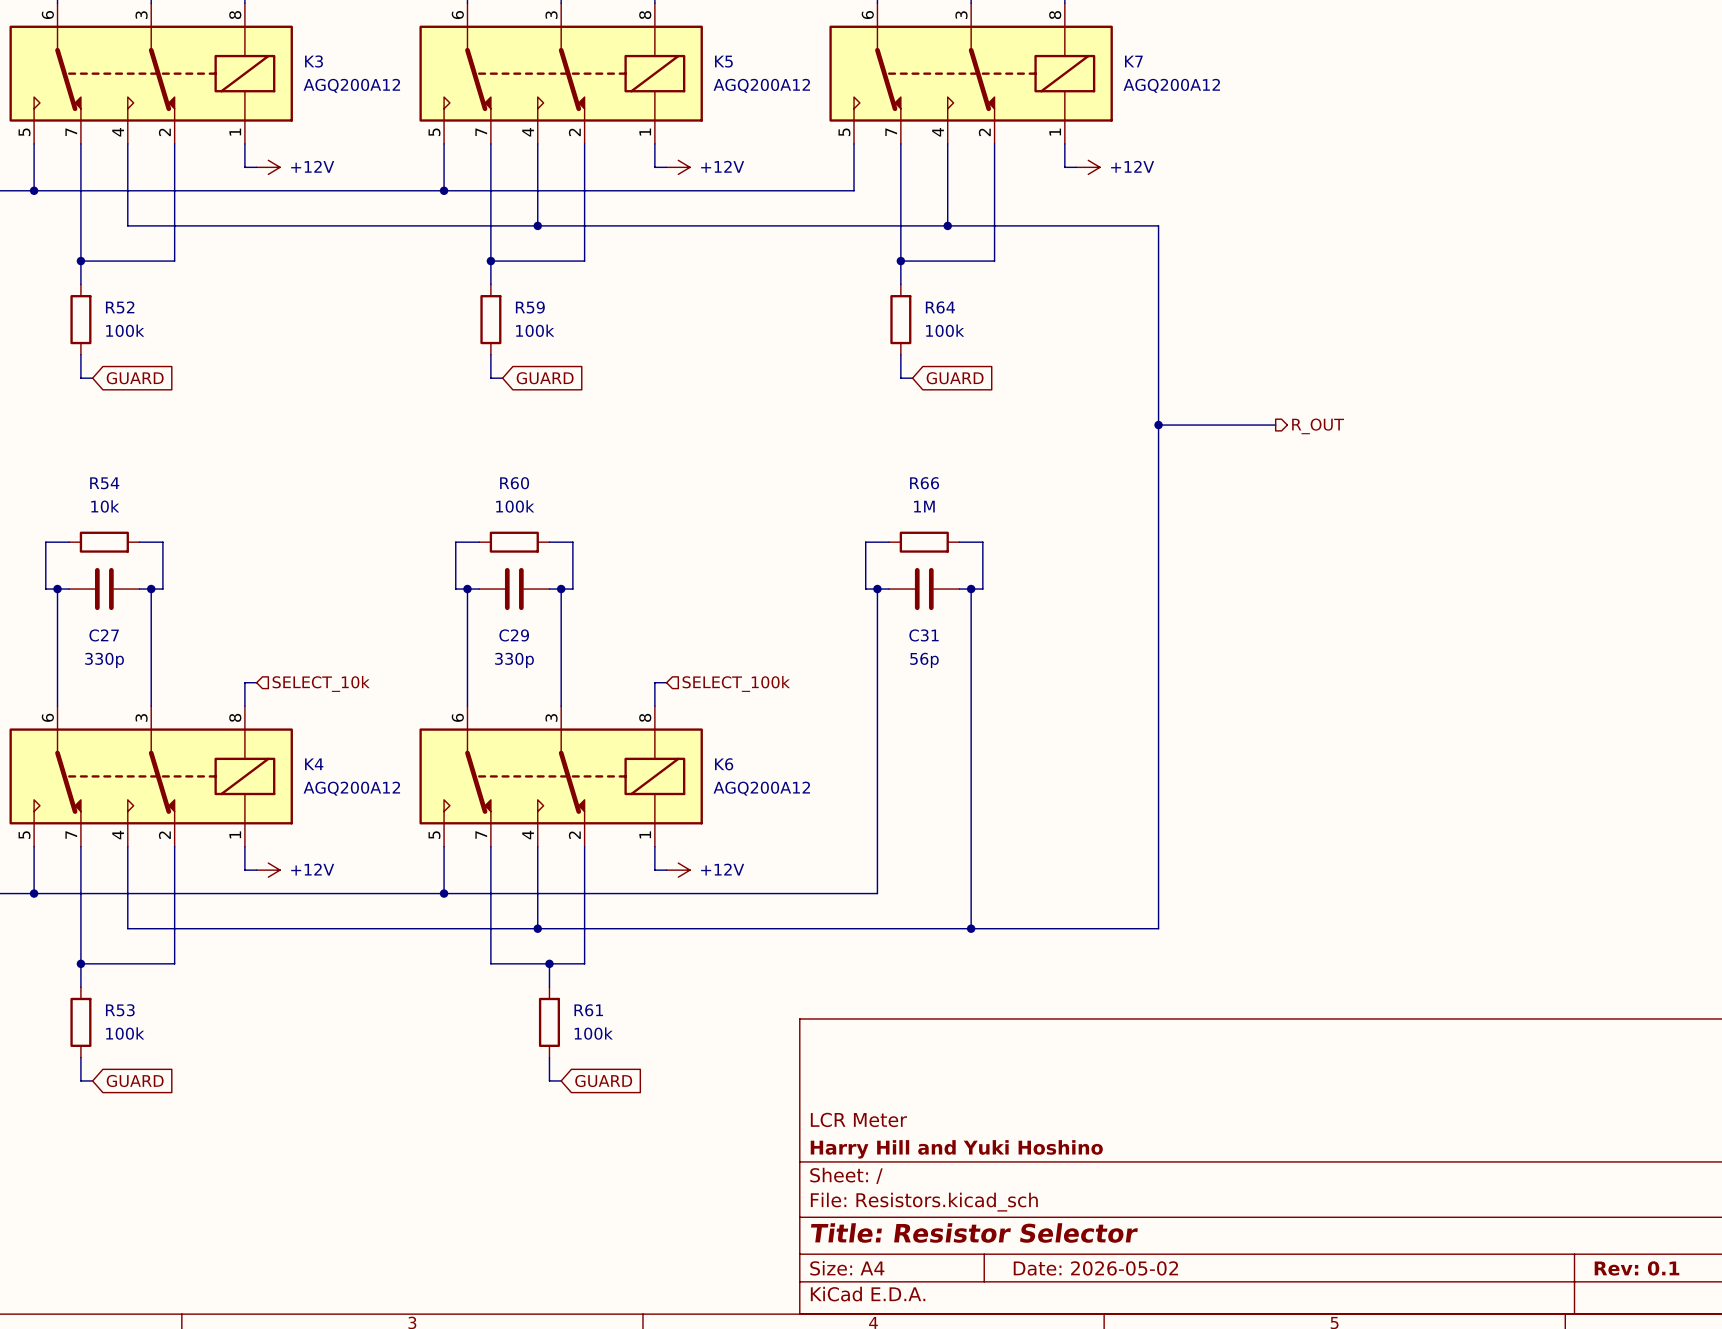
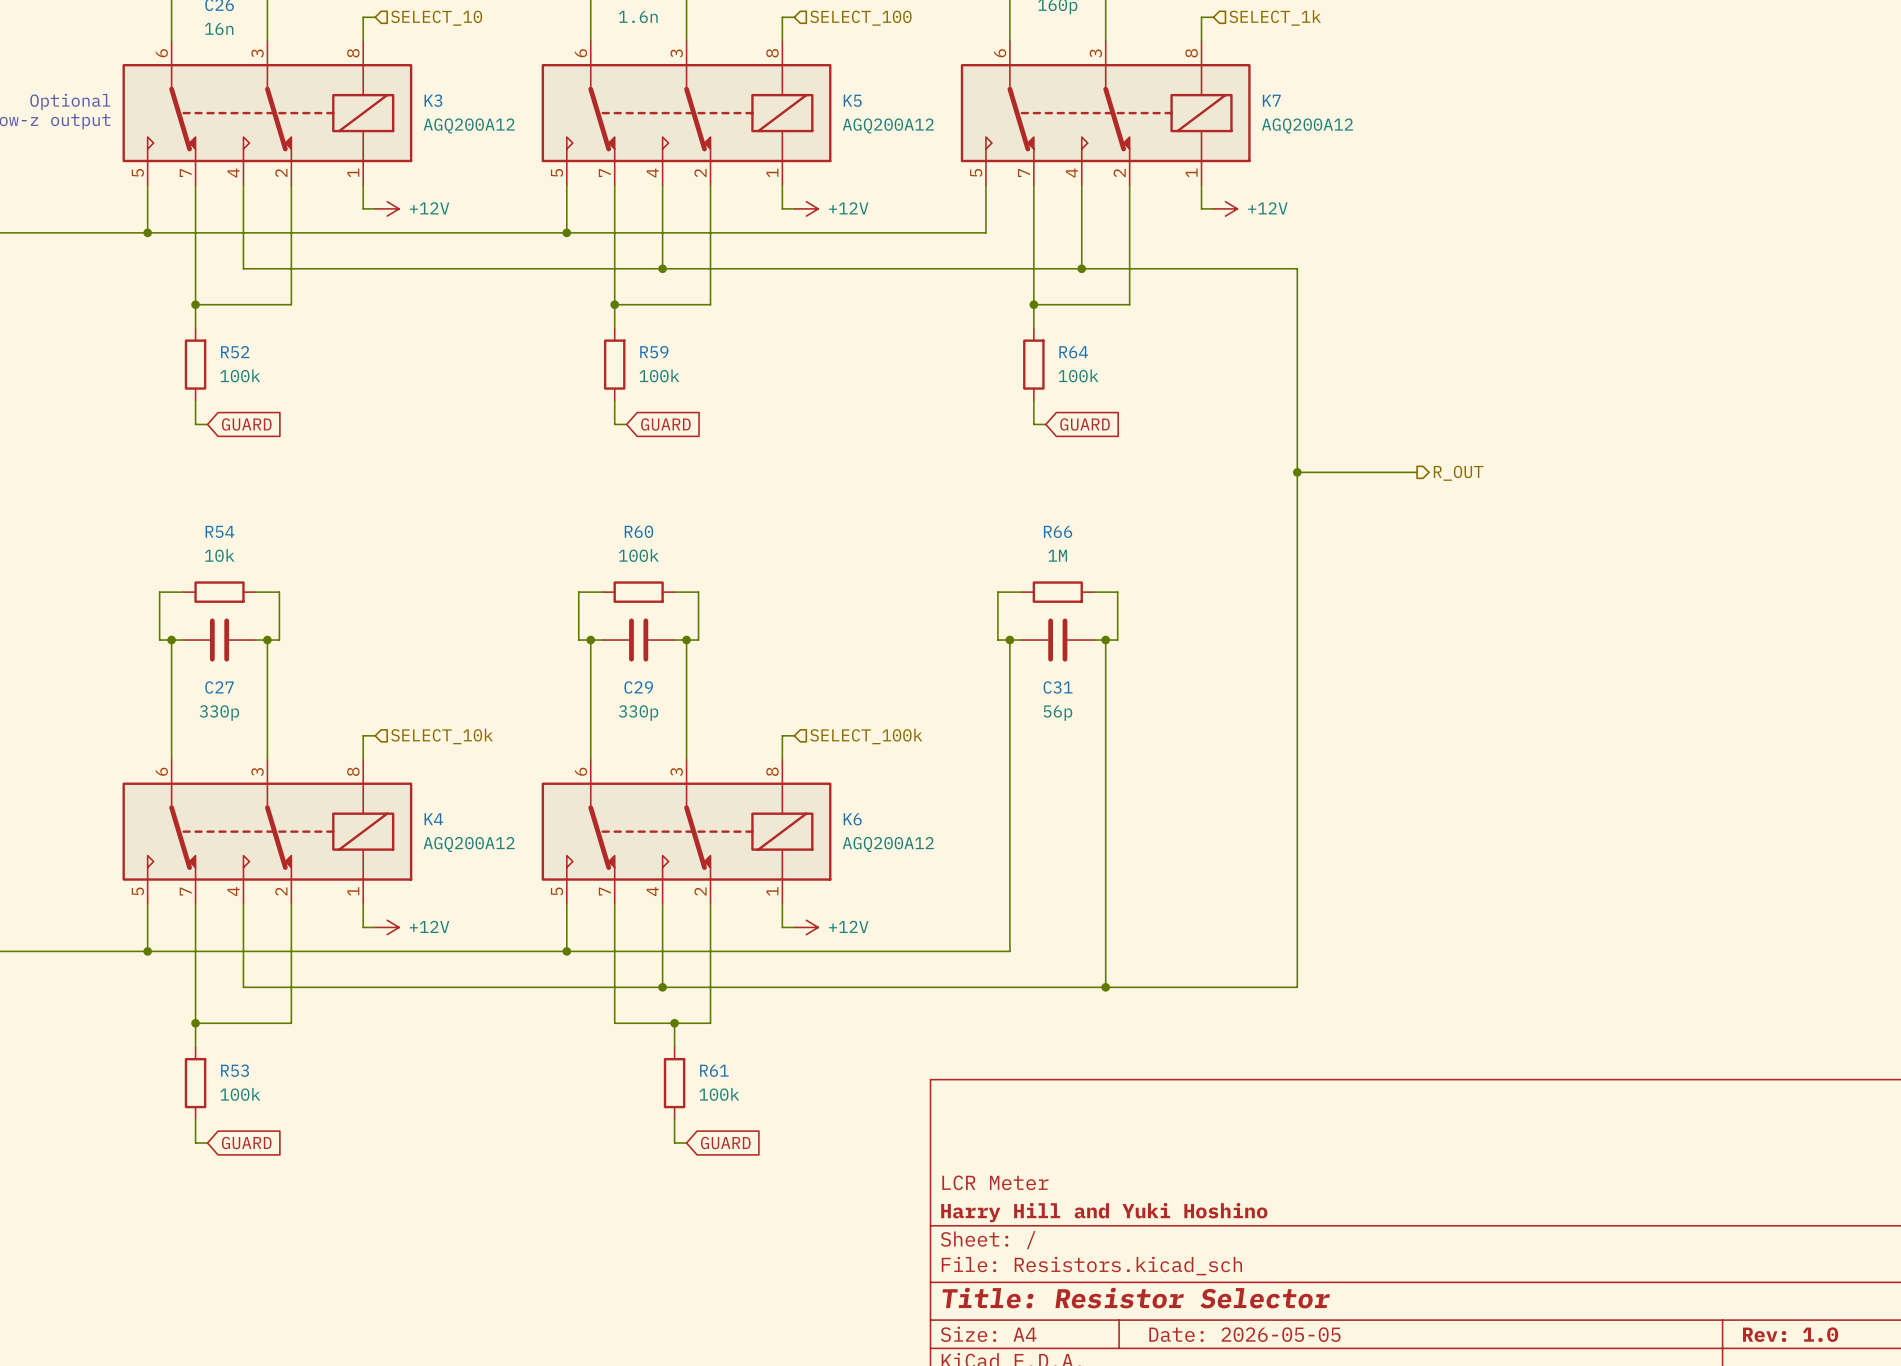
title block: Date: 2026-05-02 (1095, 1268) -> Date: 2026-05-05 (1244, 1334)
title block: Rev: 0.1 (1637, 1268) -> Rev: 1.0 (1790, 1334)

